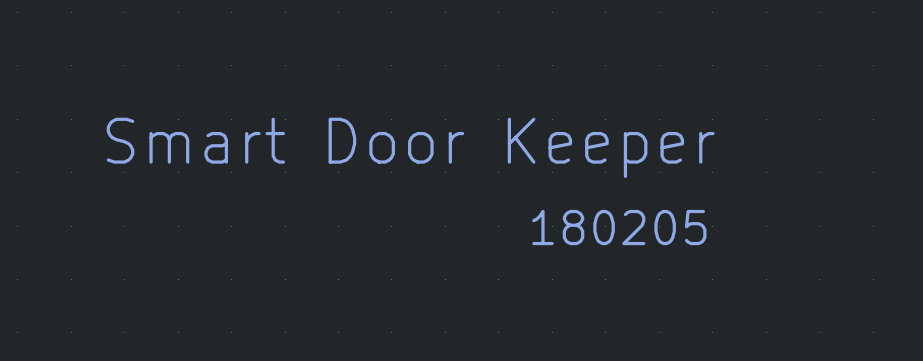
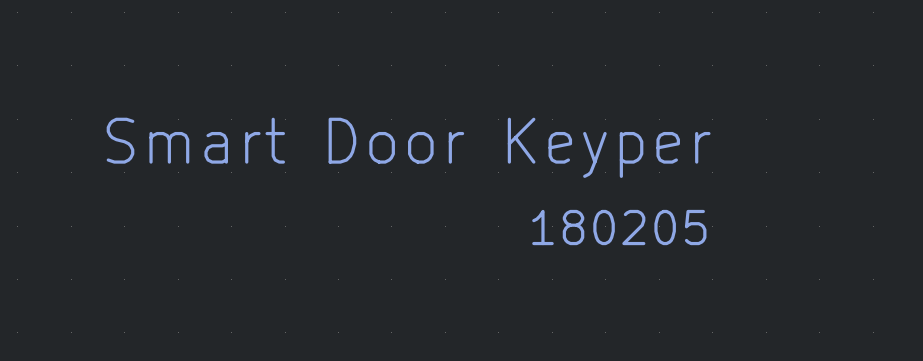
text: Smart Door Keeper (410, 147) -> Smart Door Keyper (408, 147)

